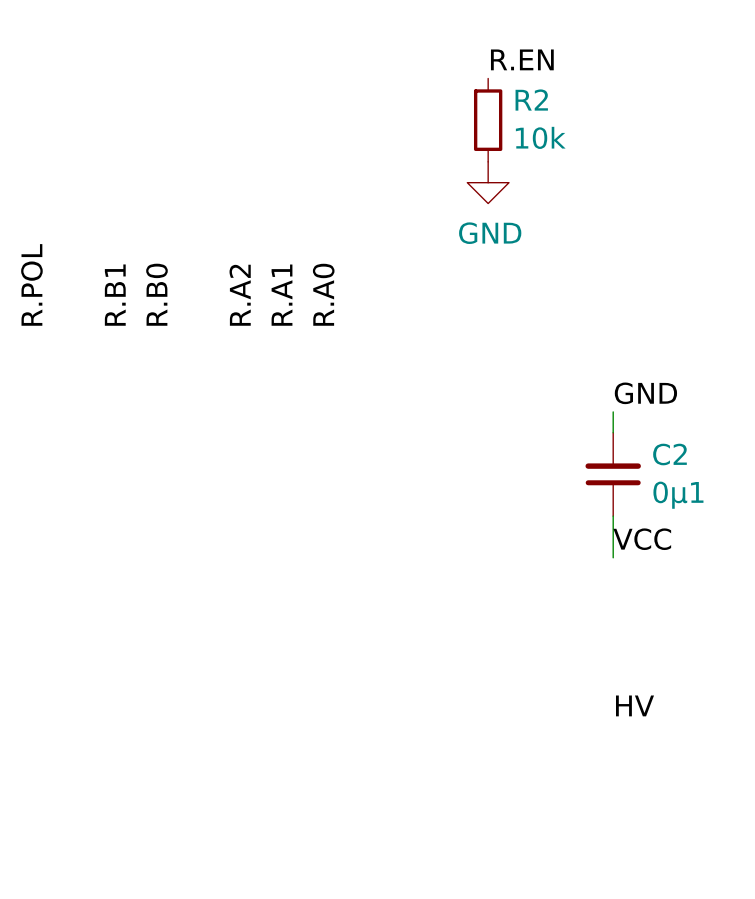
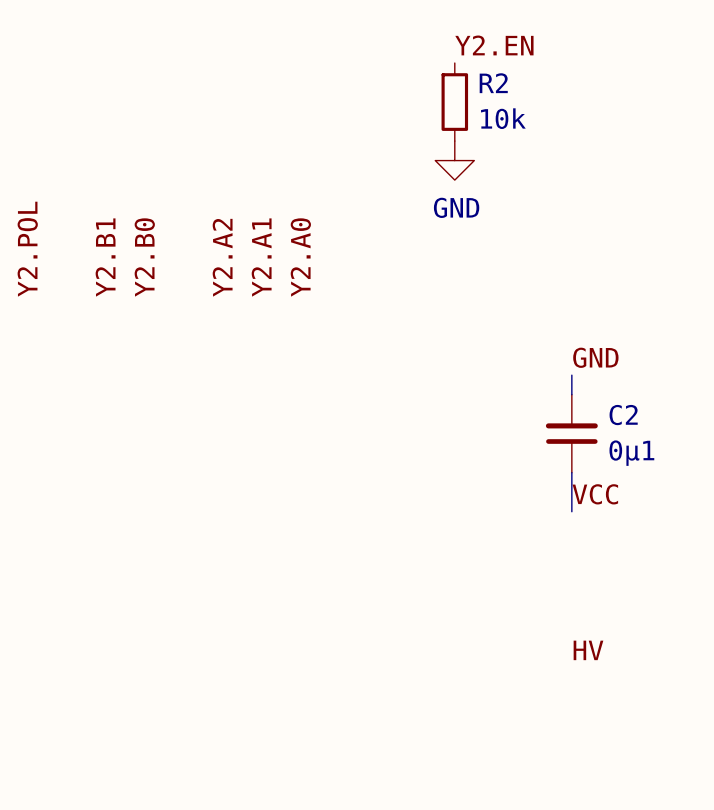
label: R.EN (522, 59) -> Y2.EN (494, 45)
label: R.POL (31, 284) -> Y2.POL (27, 249)
label: R.B0 (156, 294) -> Y2.B0 (144, 257)
label: R.A0 (323, 294) -> Y2.A0 (300, 257)
label: R.B1 (115, 295) -> Y2.B1 (105, 257)
label: R.A2 (240, 295) -> Y2.A2 (222, 257)
label: R.A1 (282, 295) -> Y2.A1 (261, 257)

